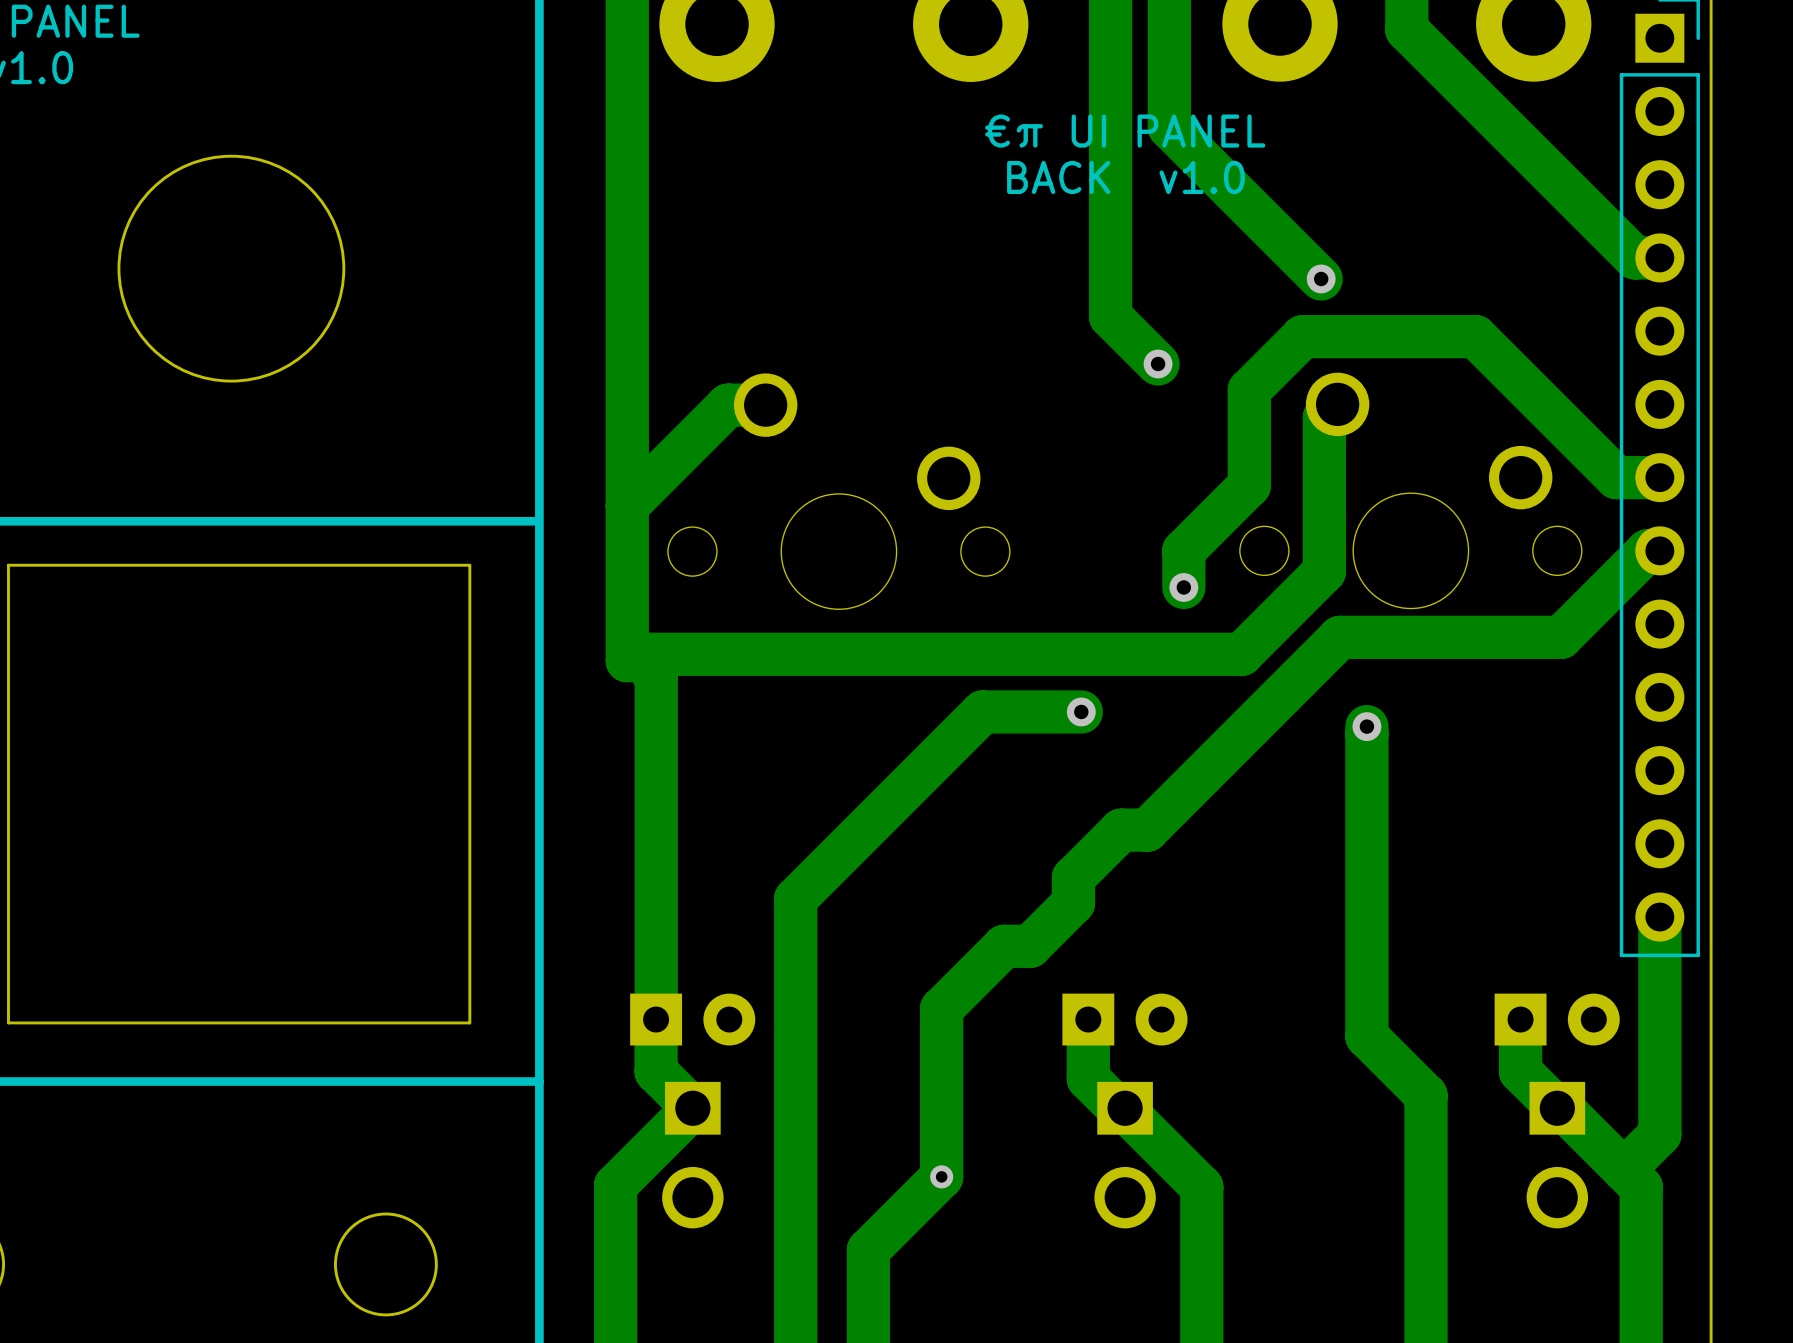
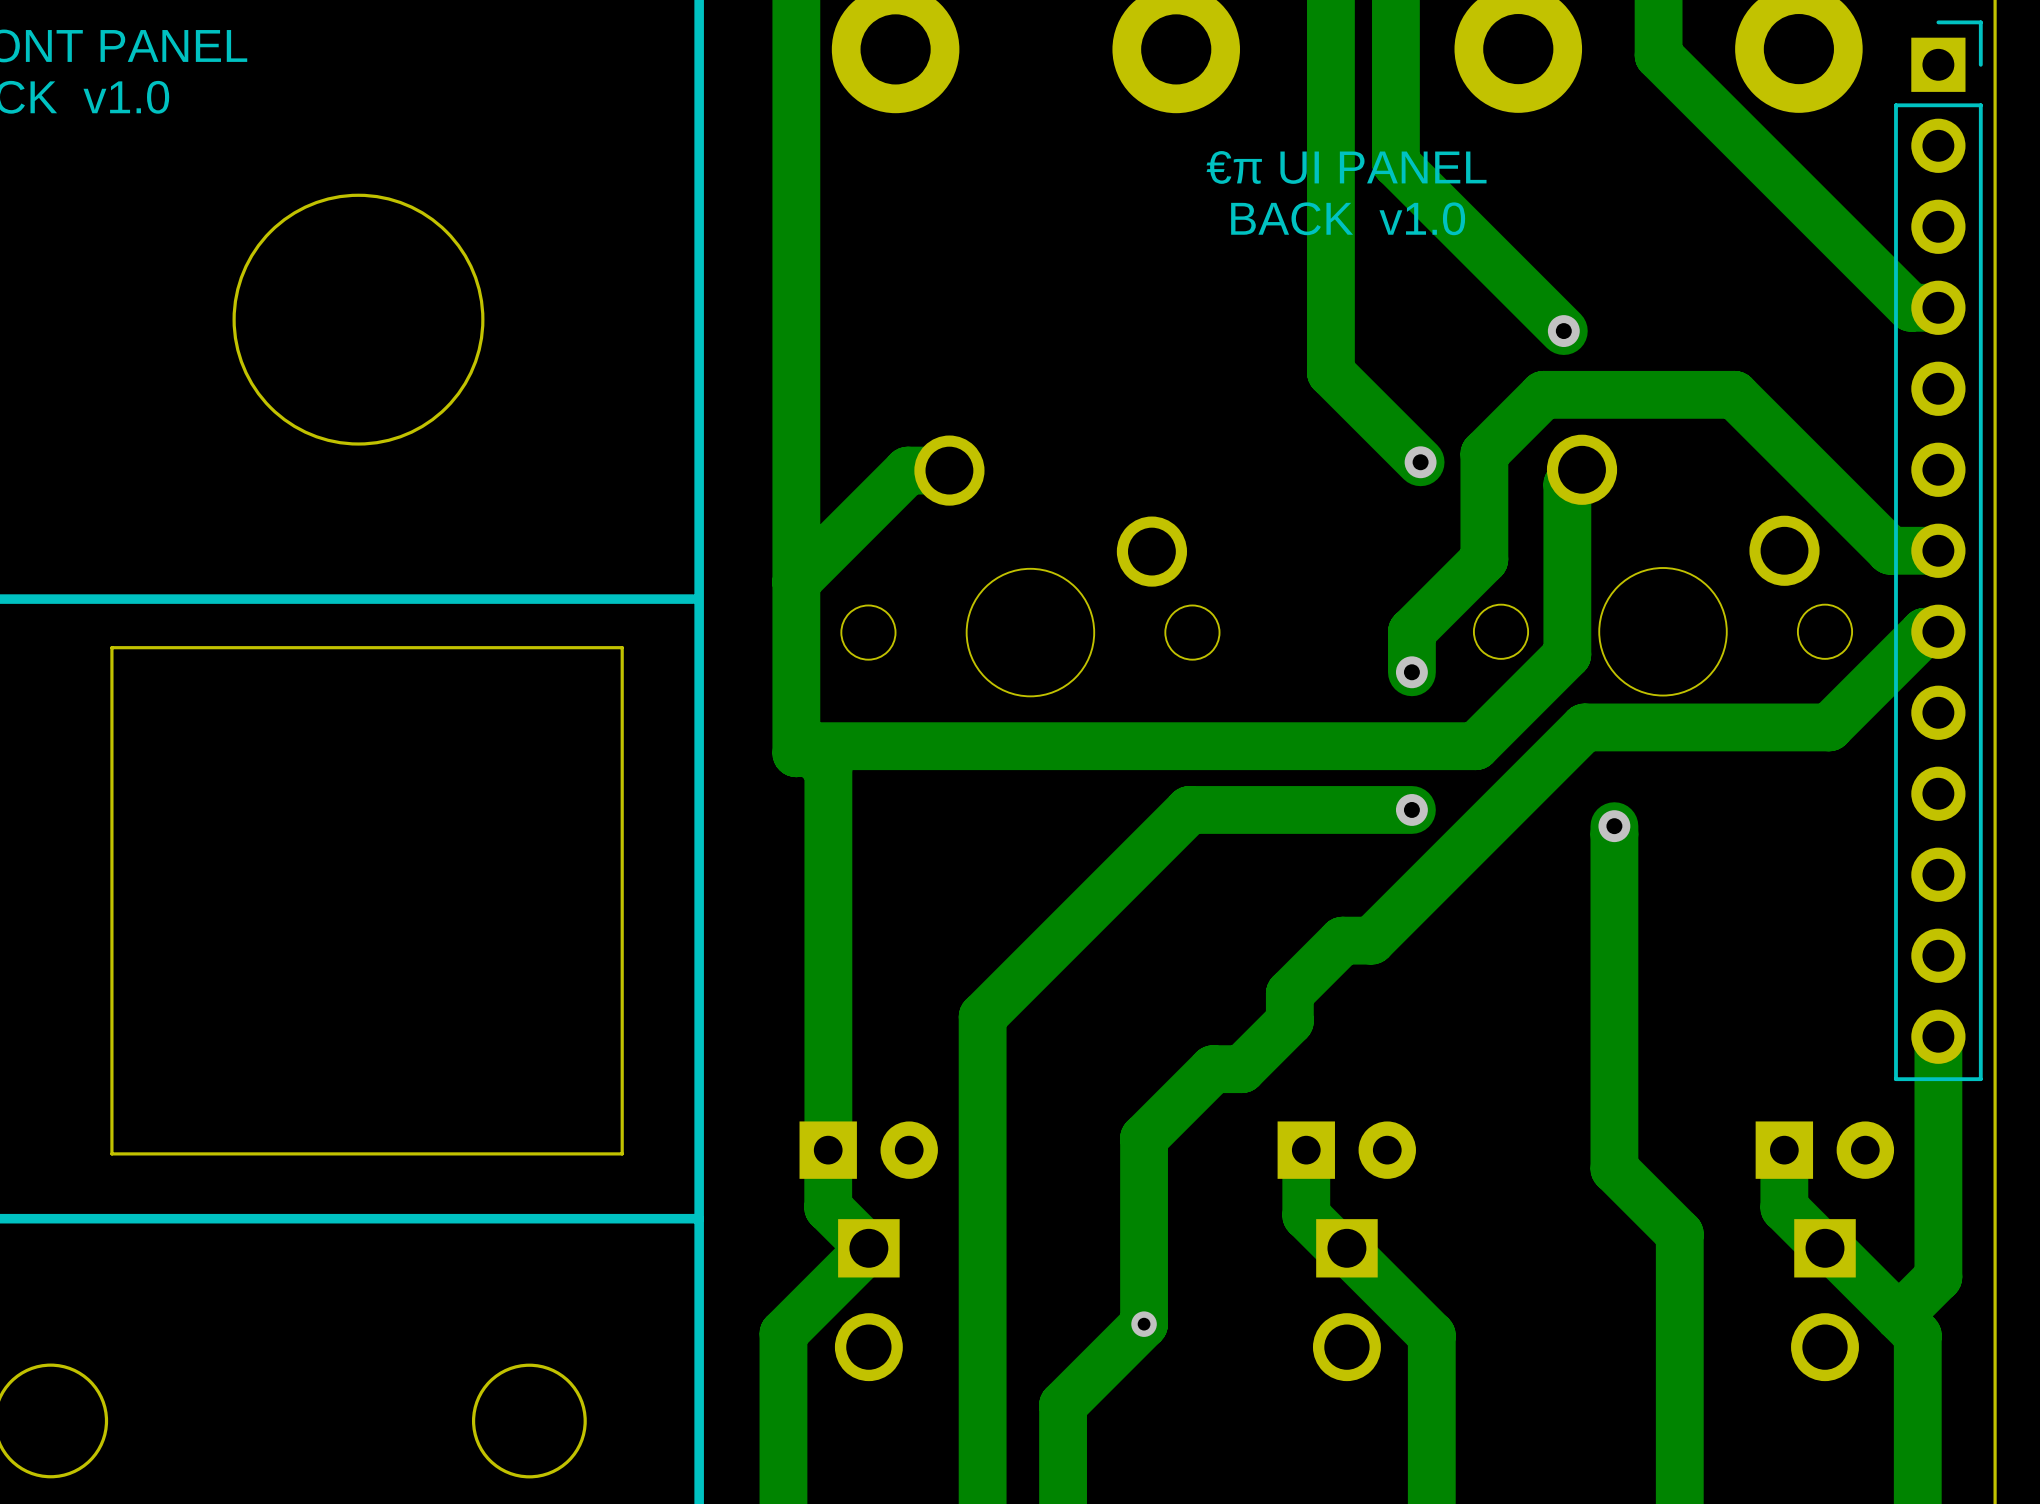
track: none -> (1383, 425) (1420, 462)
via position: (1158, 363) -> (1420, 462)
via position: (1081, 711) -> (1411, 809)
track: none -> (1411, 809) (1298, 809)

